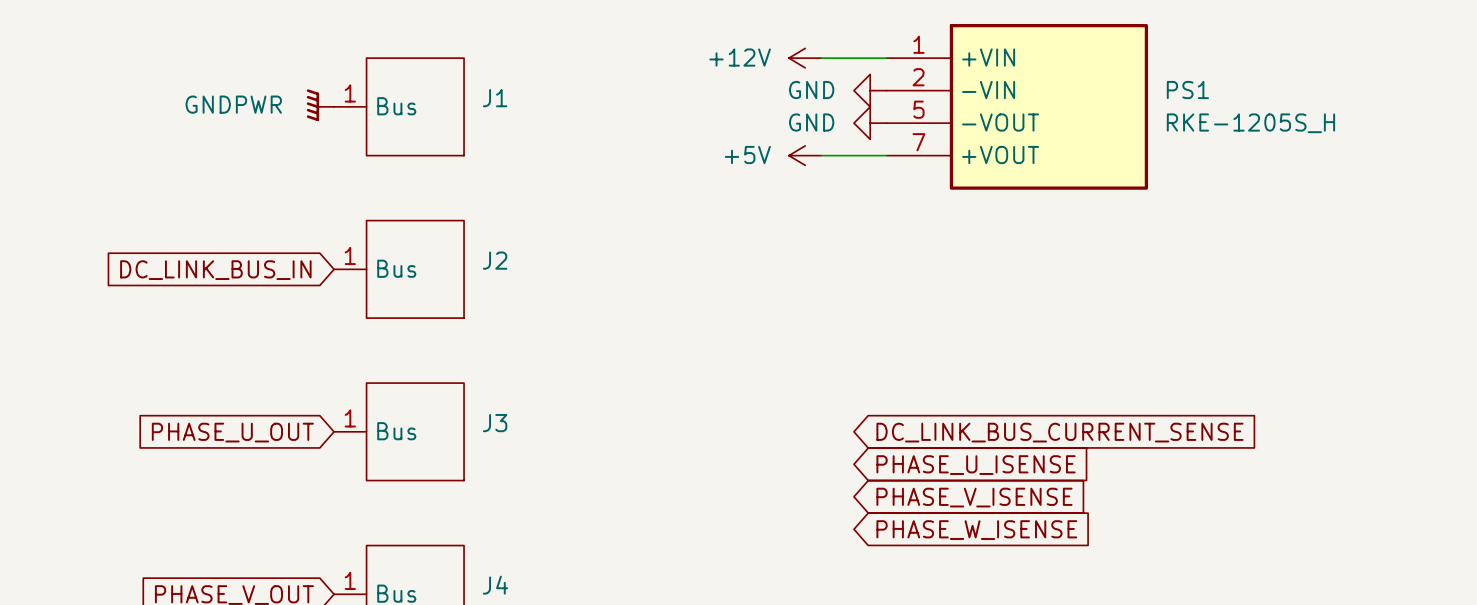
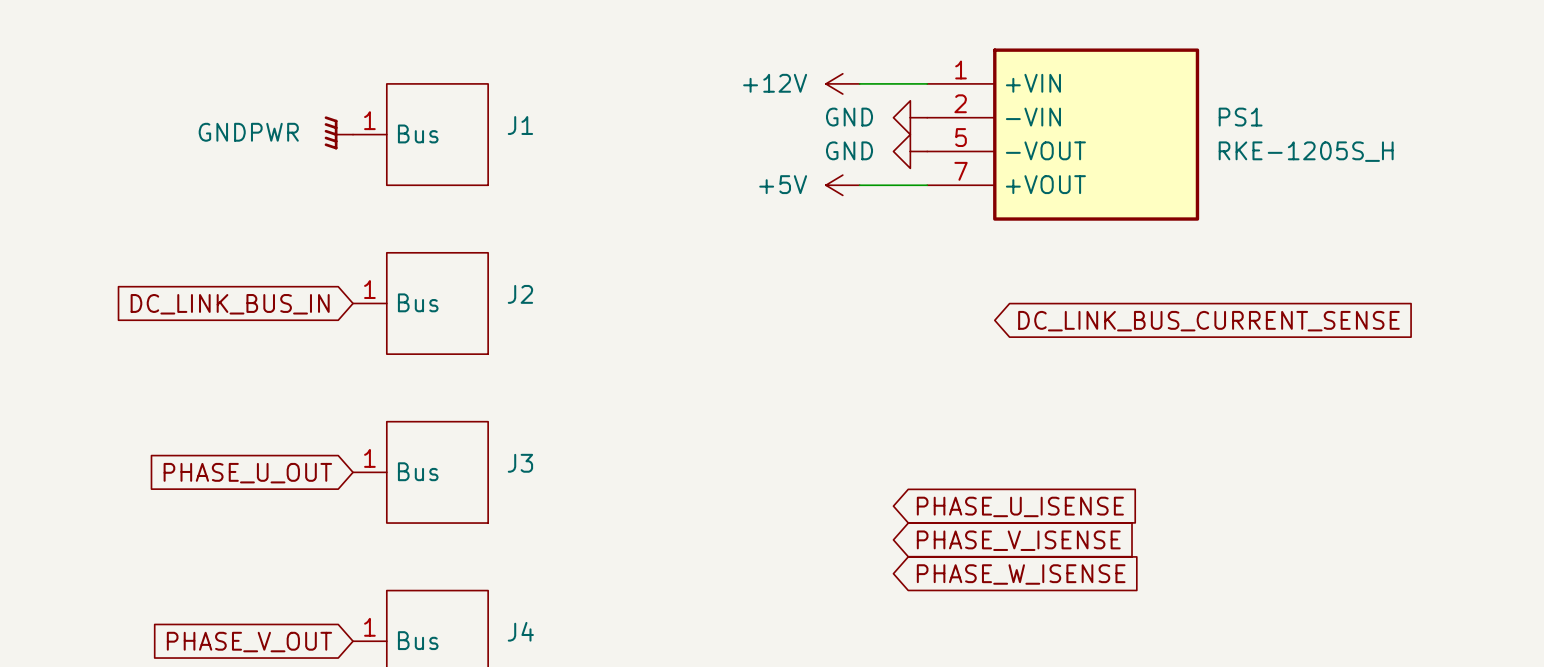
global label position: DC_LINK_BUS_CURRENT_SENSE (1059, 432) -> DC_LINK_BUS_CURRENT_SENSE (1208, 321)

